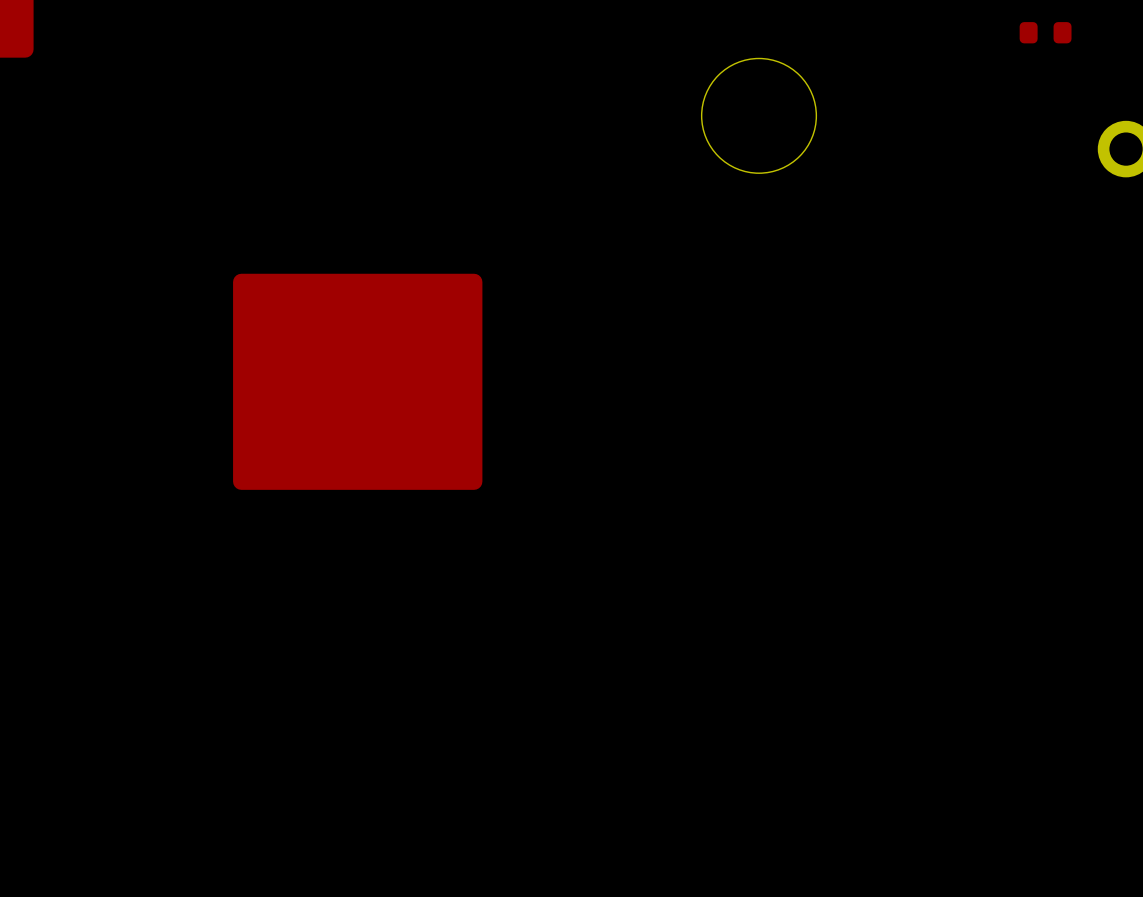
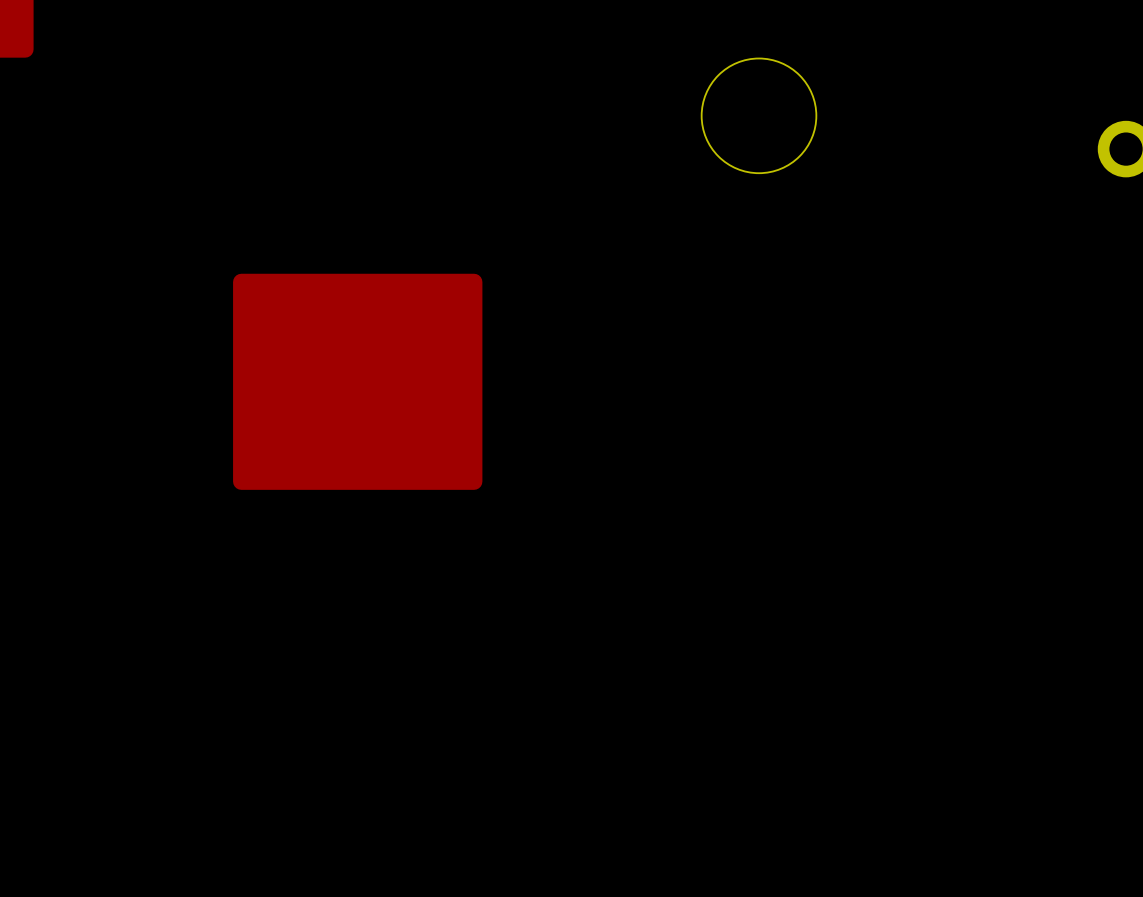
part: (1045, 32) -> none

